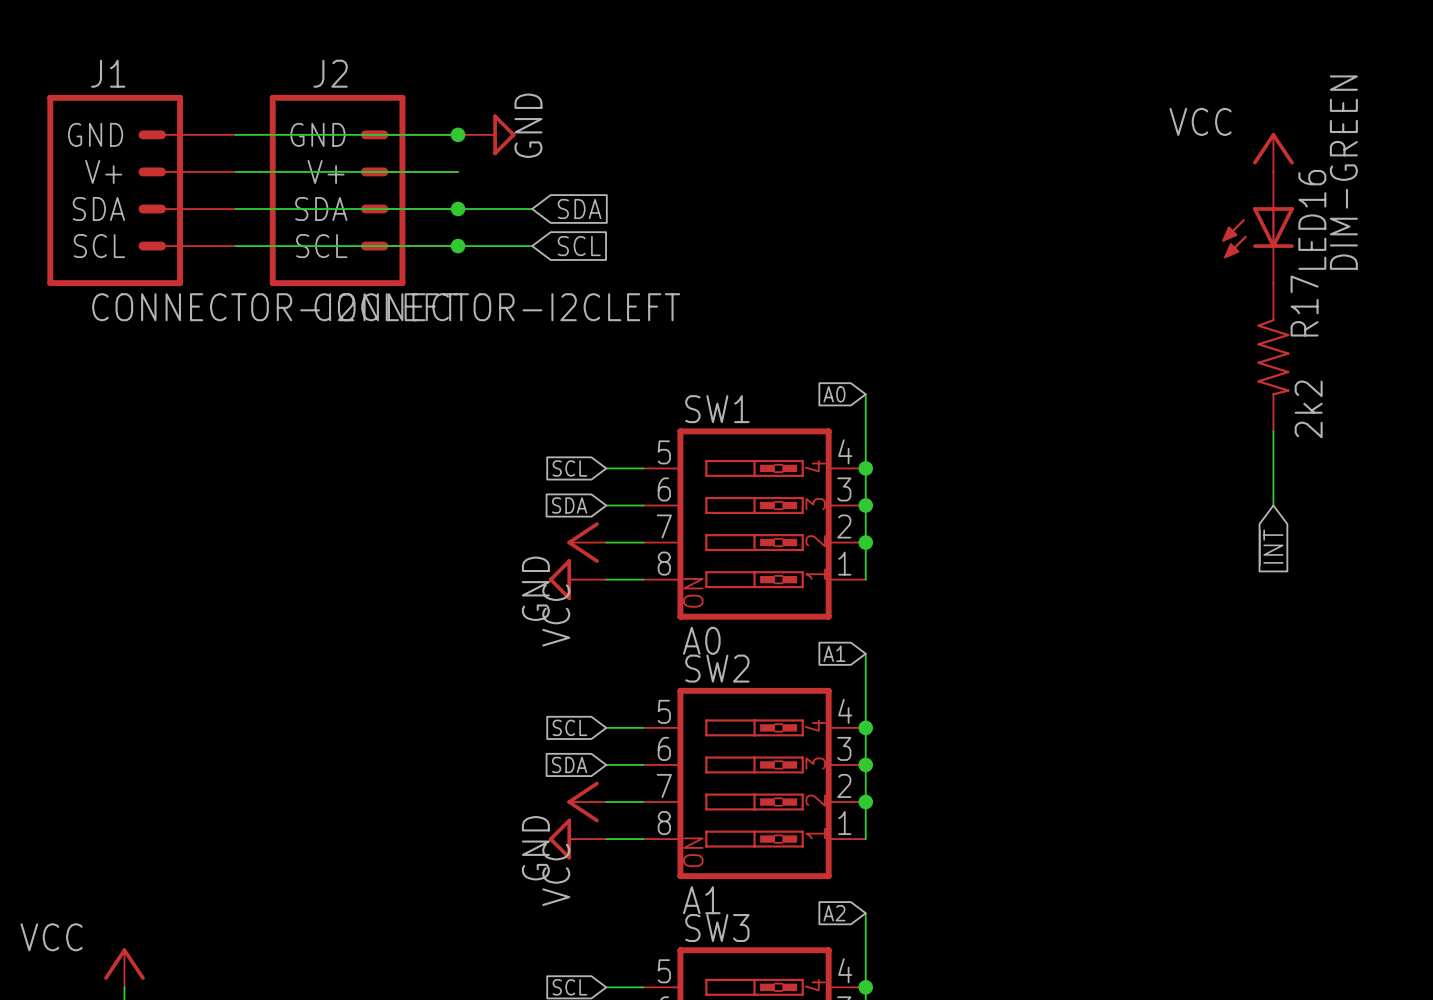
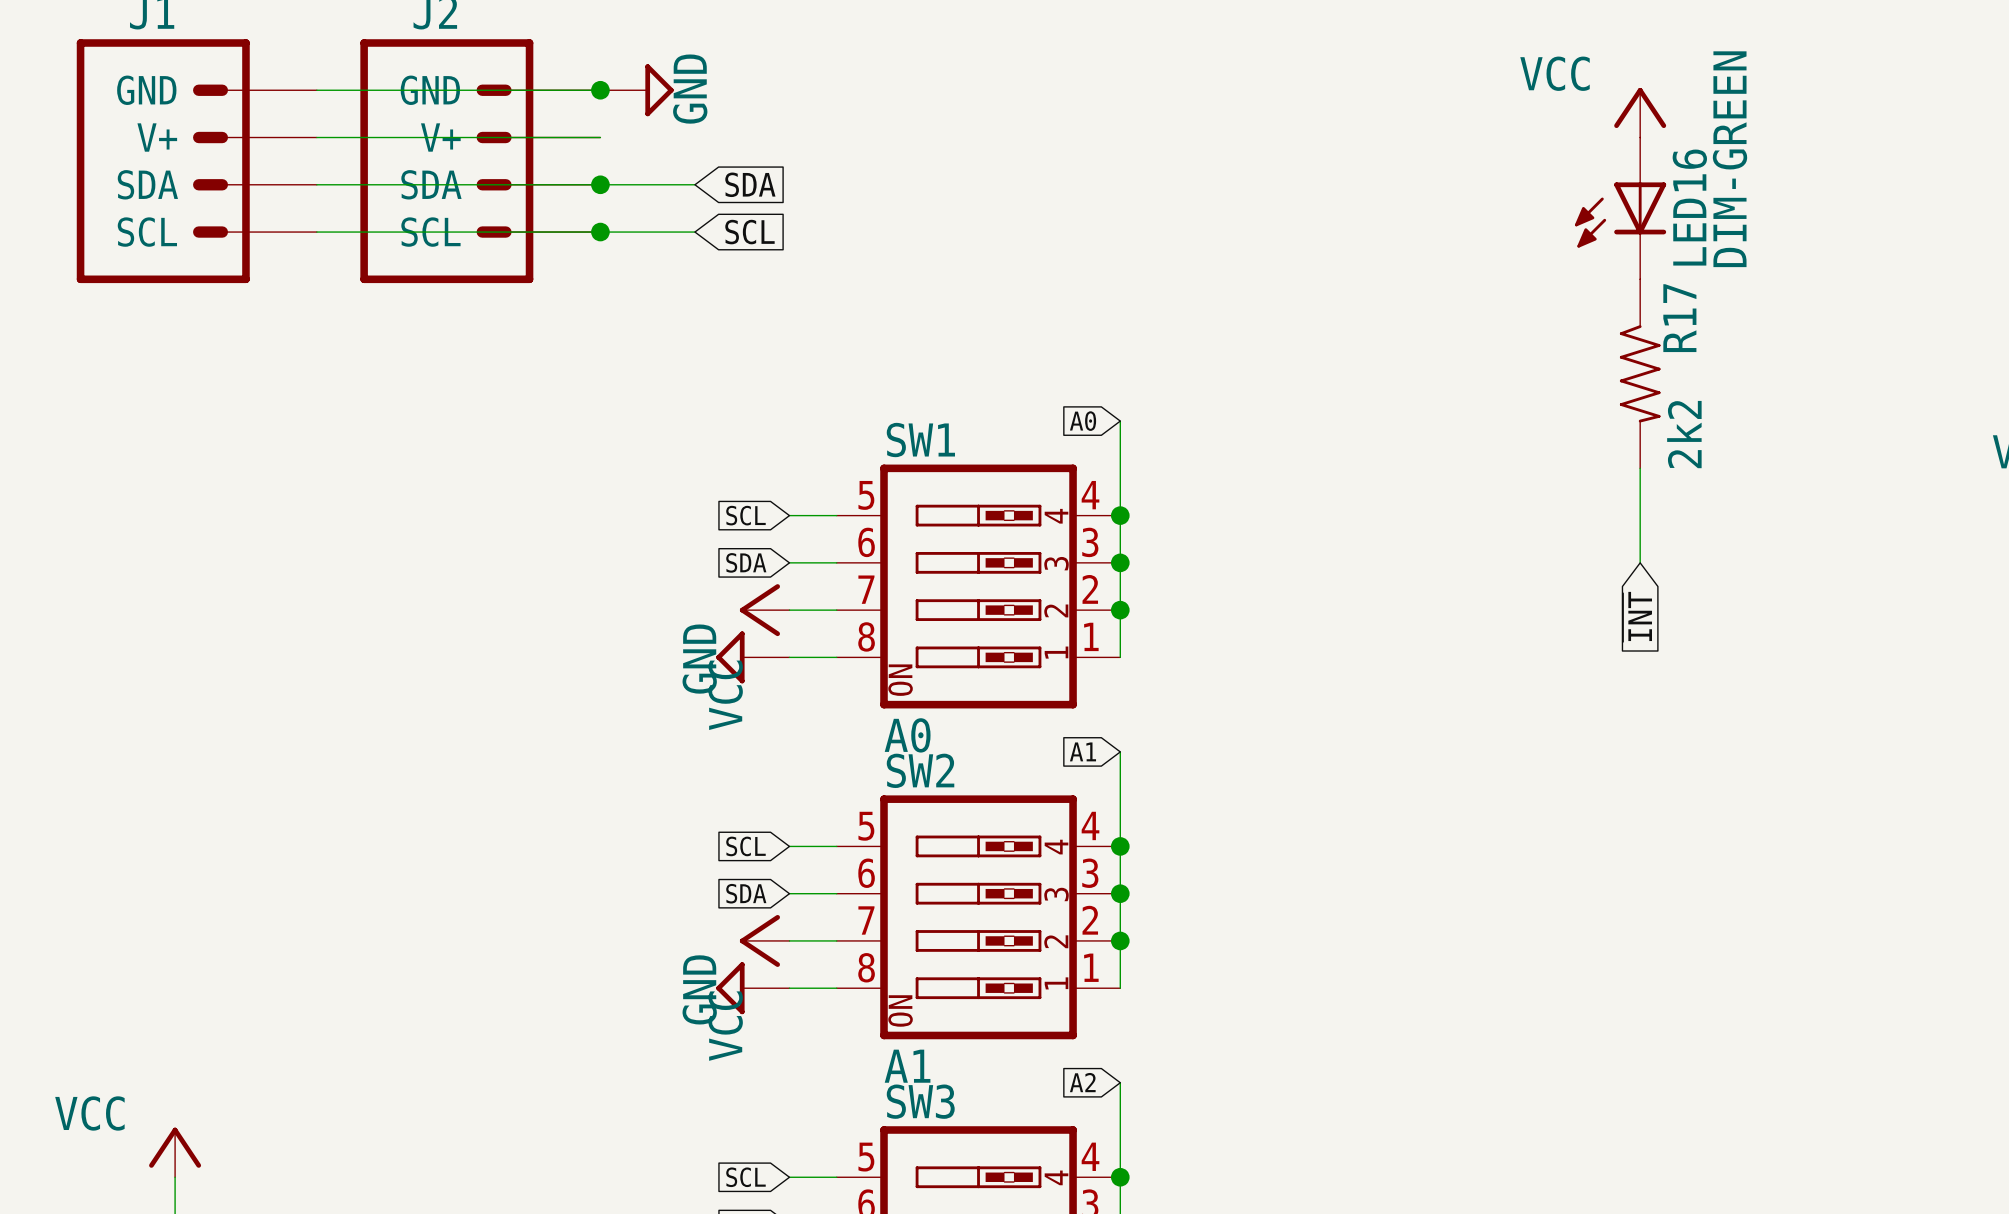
J1 value: CONNECTOR-I2CLEFT (275, 307) -> none
J2 value: CONNECTOR-I2CLEFT (497, 307) -> none

